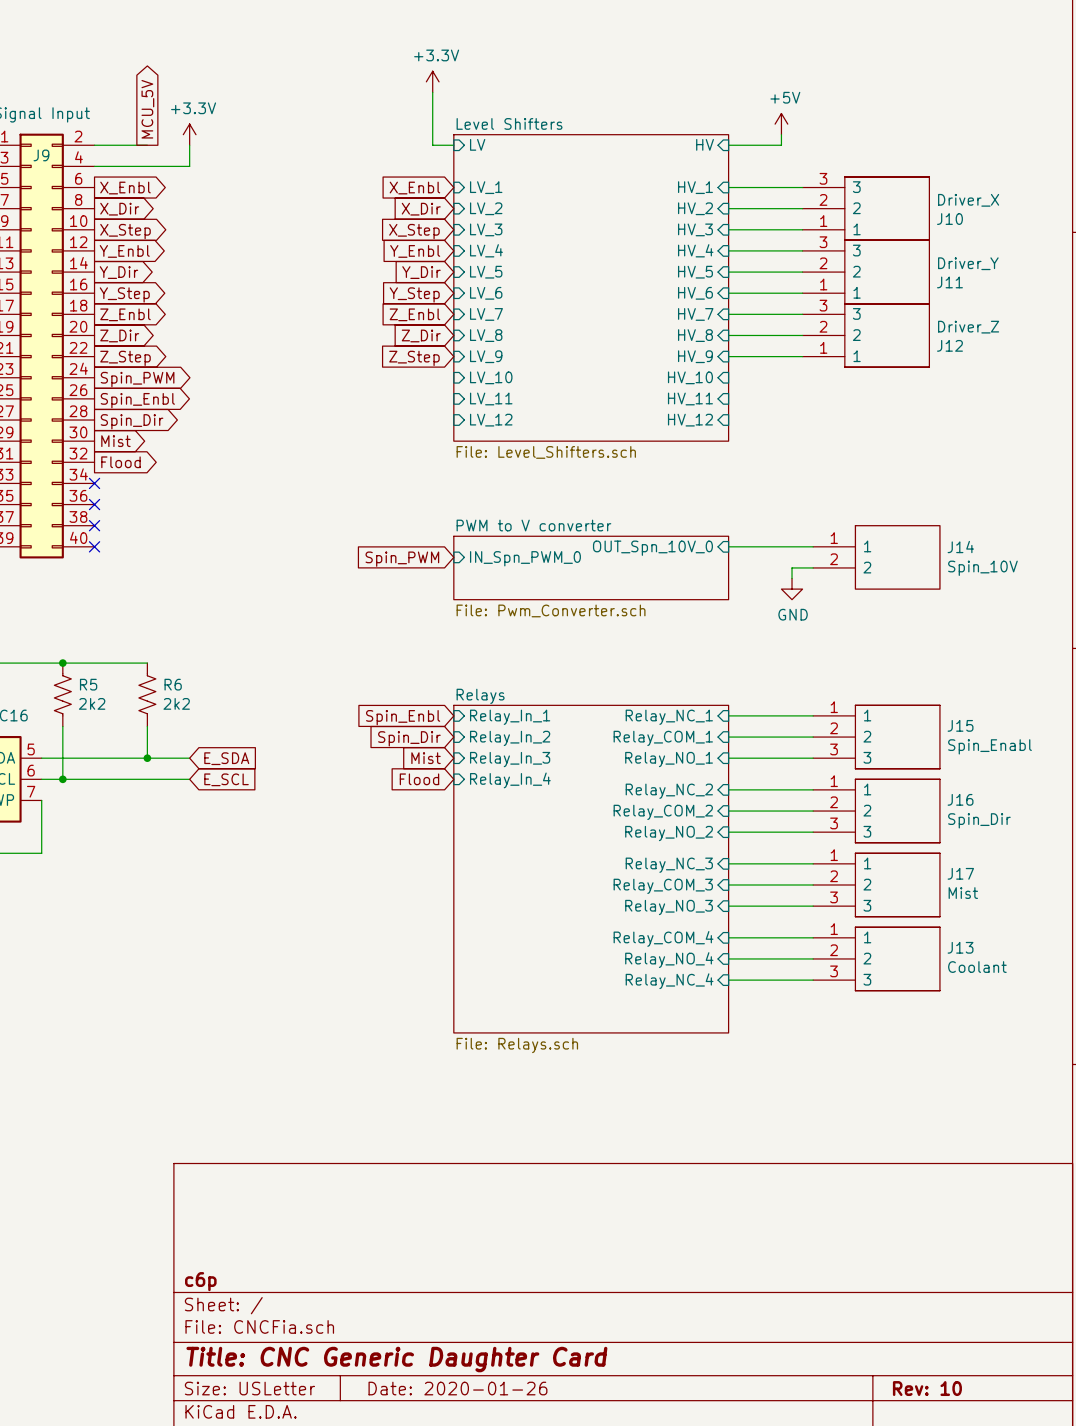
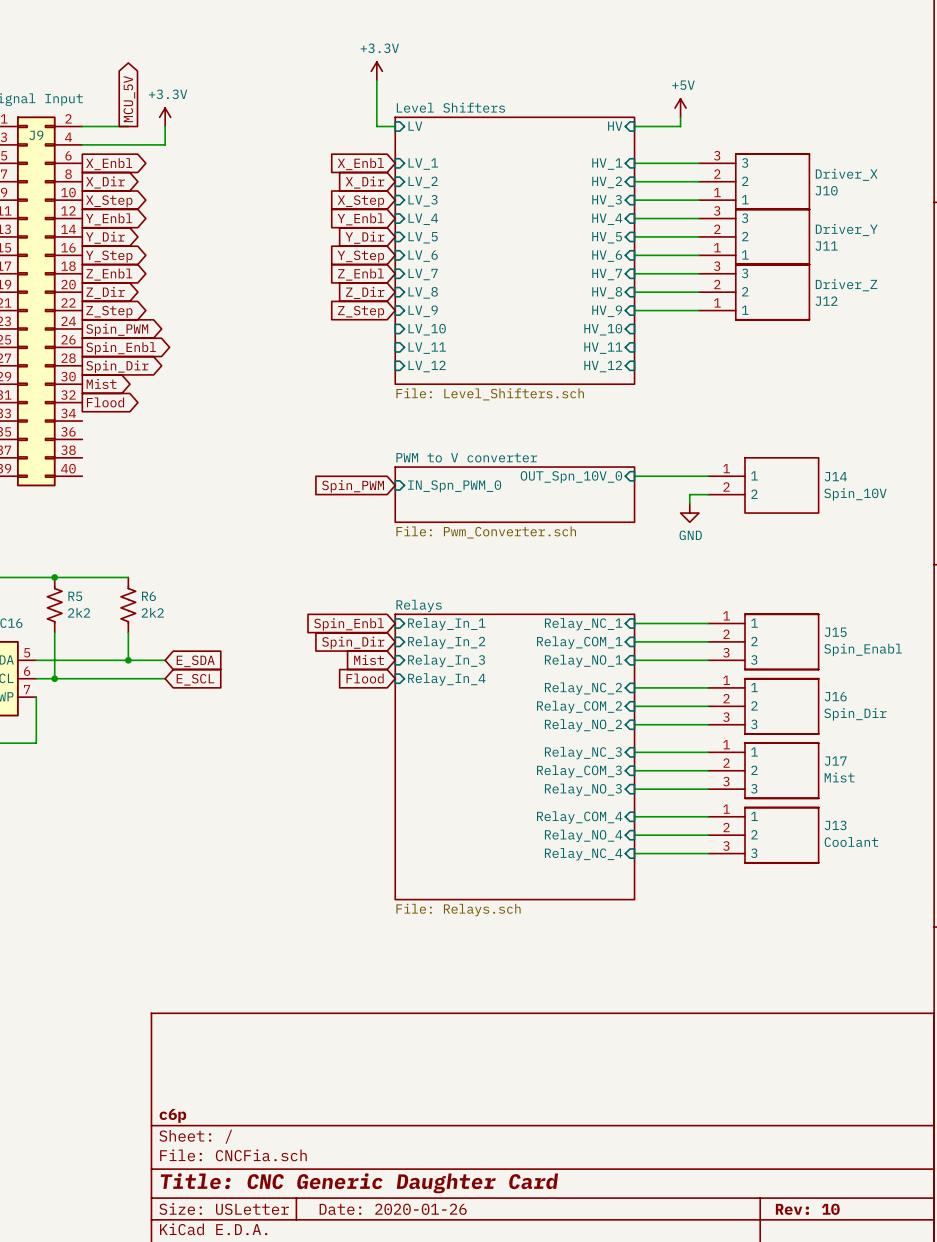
no-connect mark: (94, 483) -> none
no-connect mark: (94, 504) -> none
no-connect mark: (94, 525) -> none
no-connect mark: (94, 546) -> none

